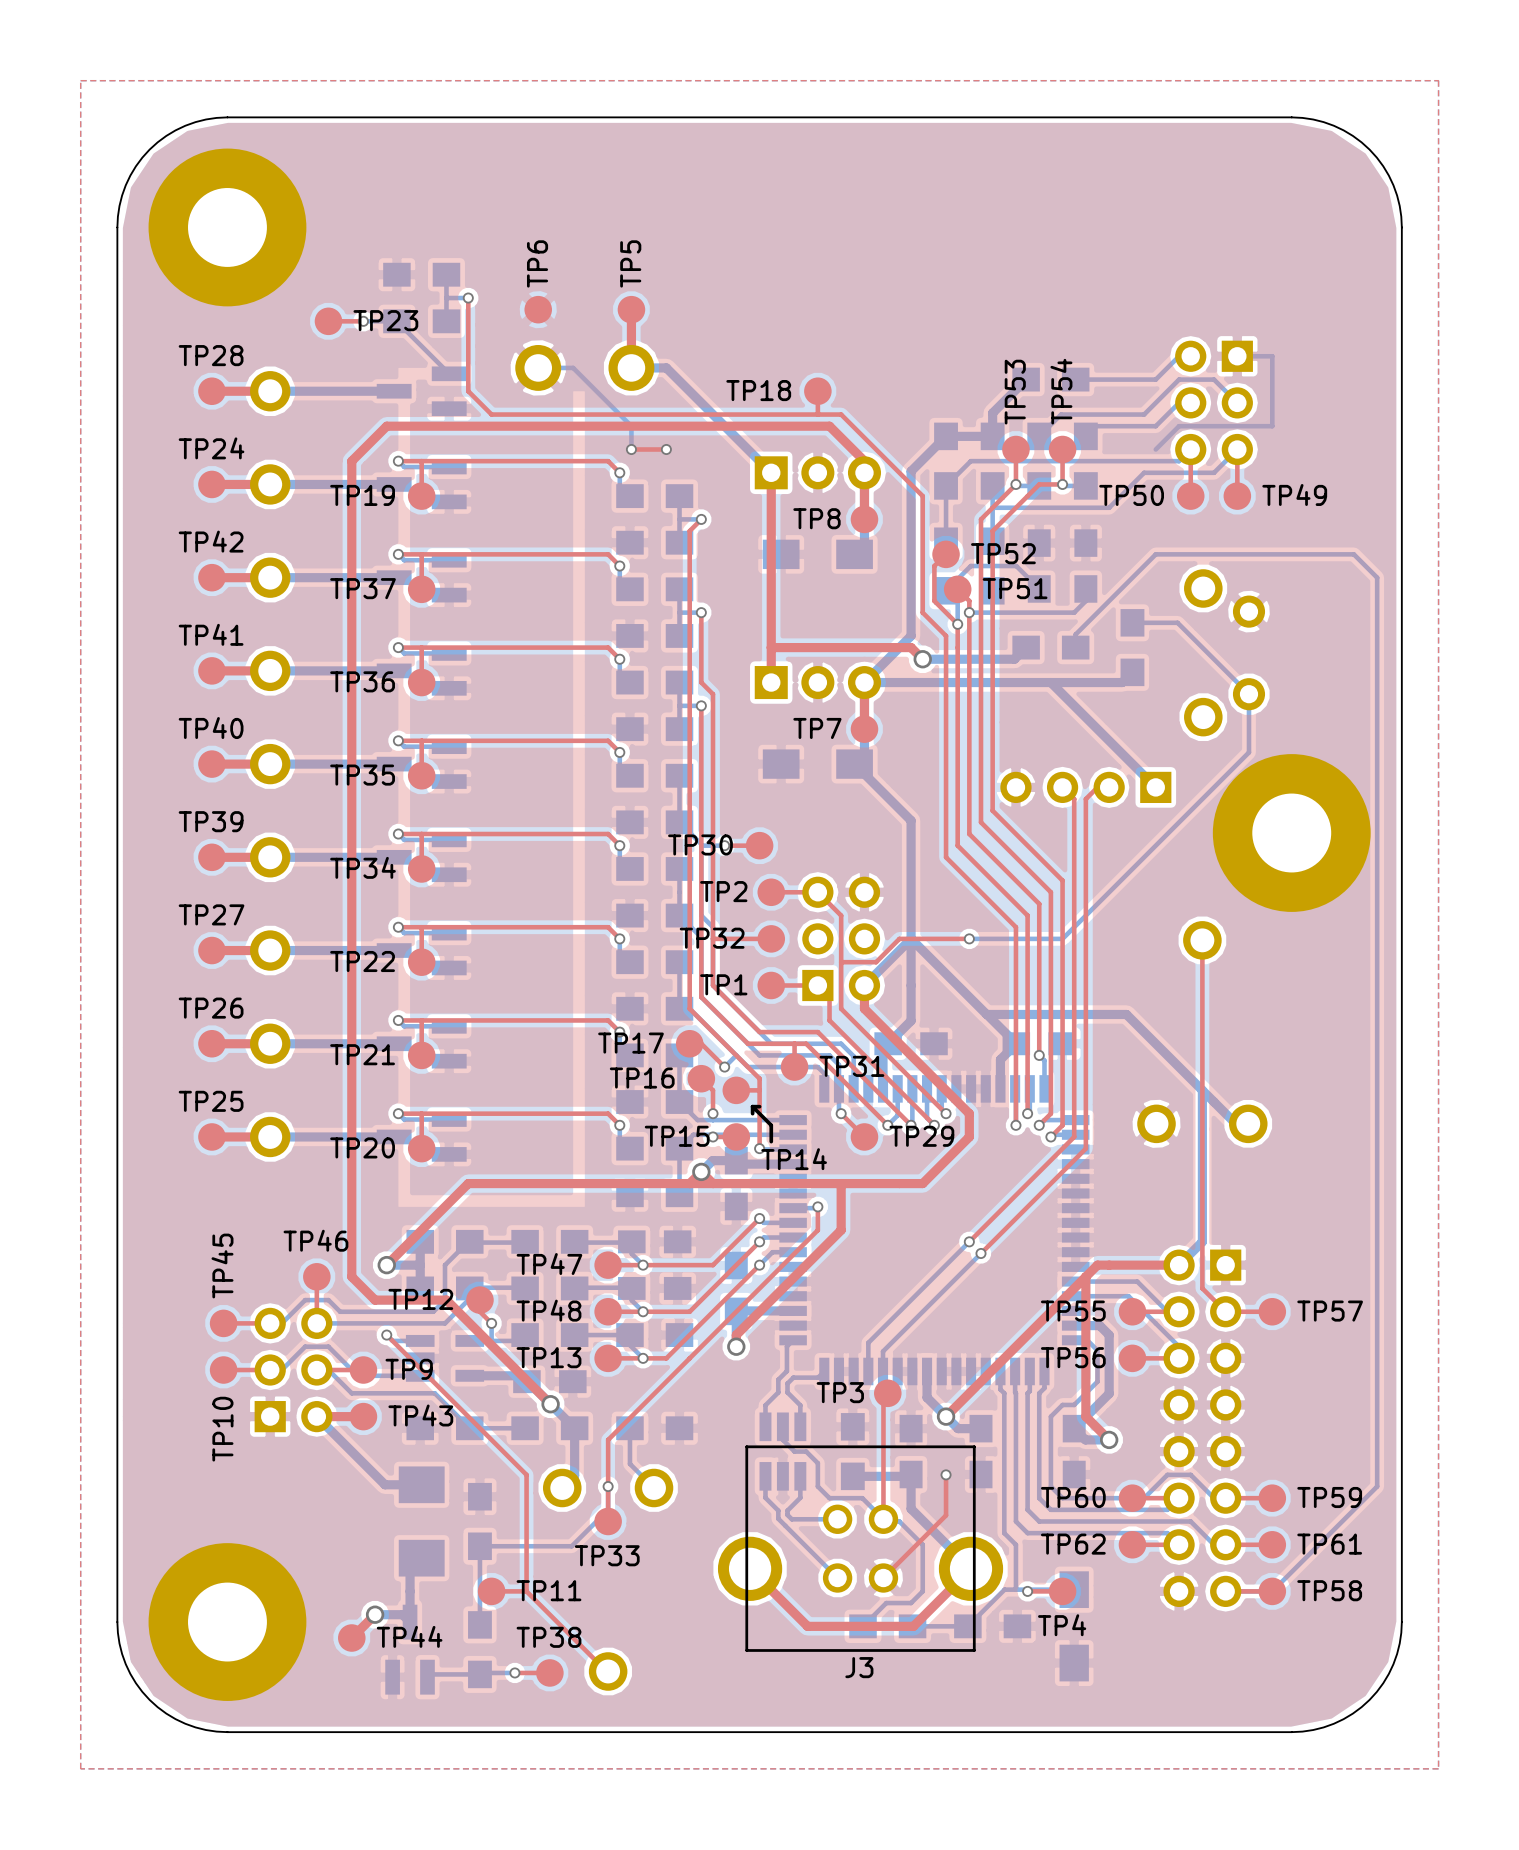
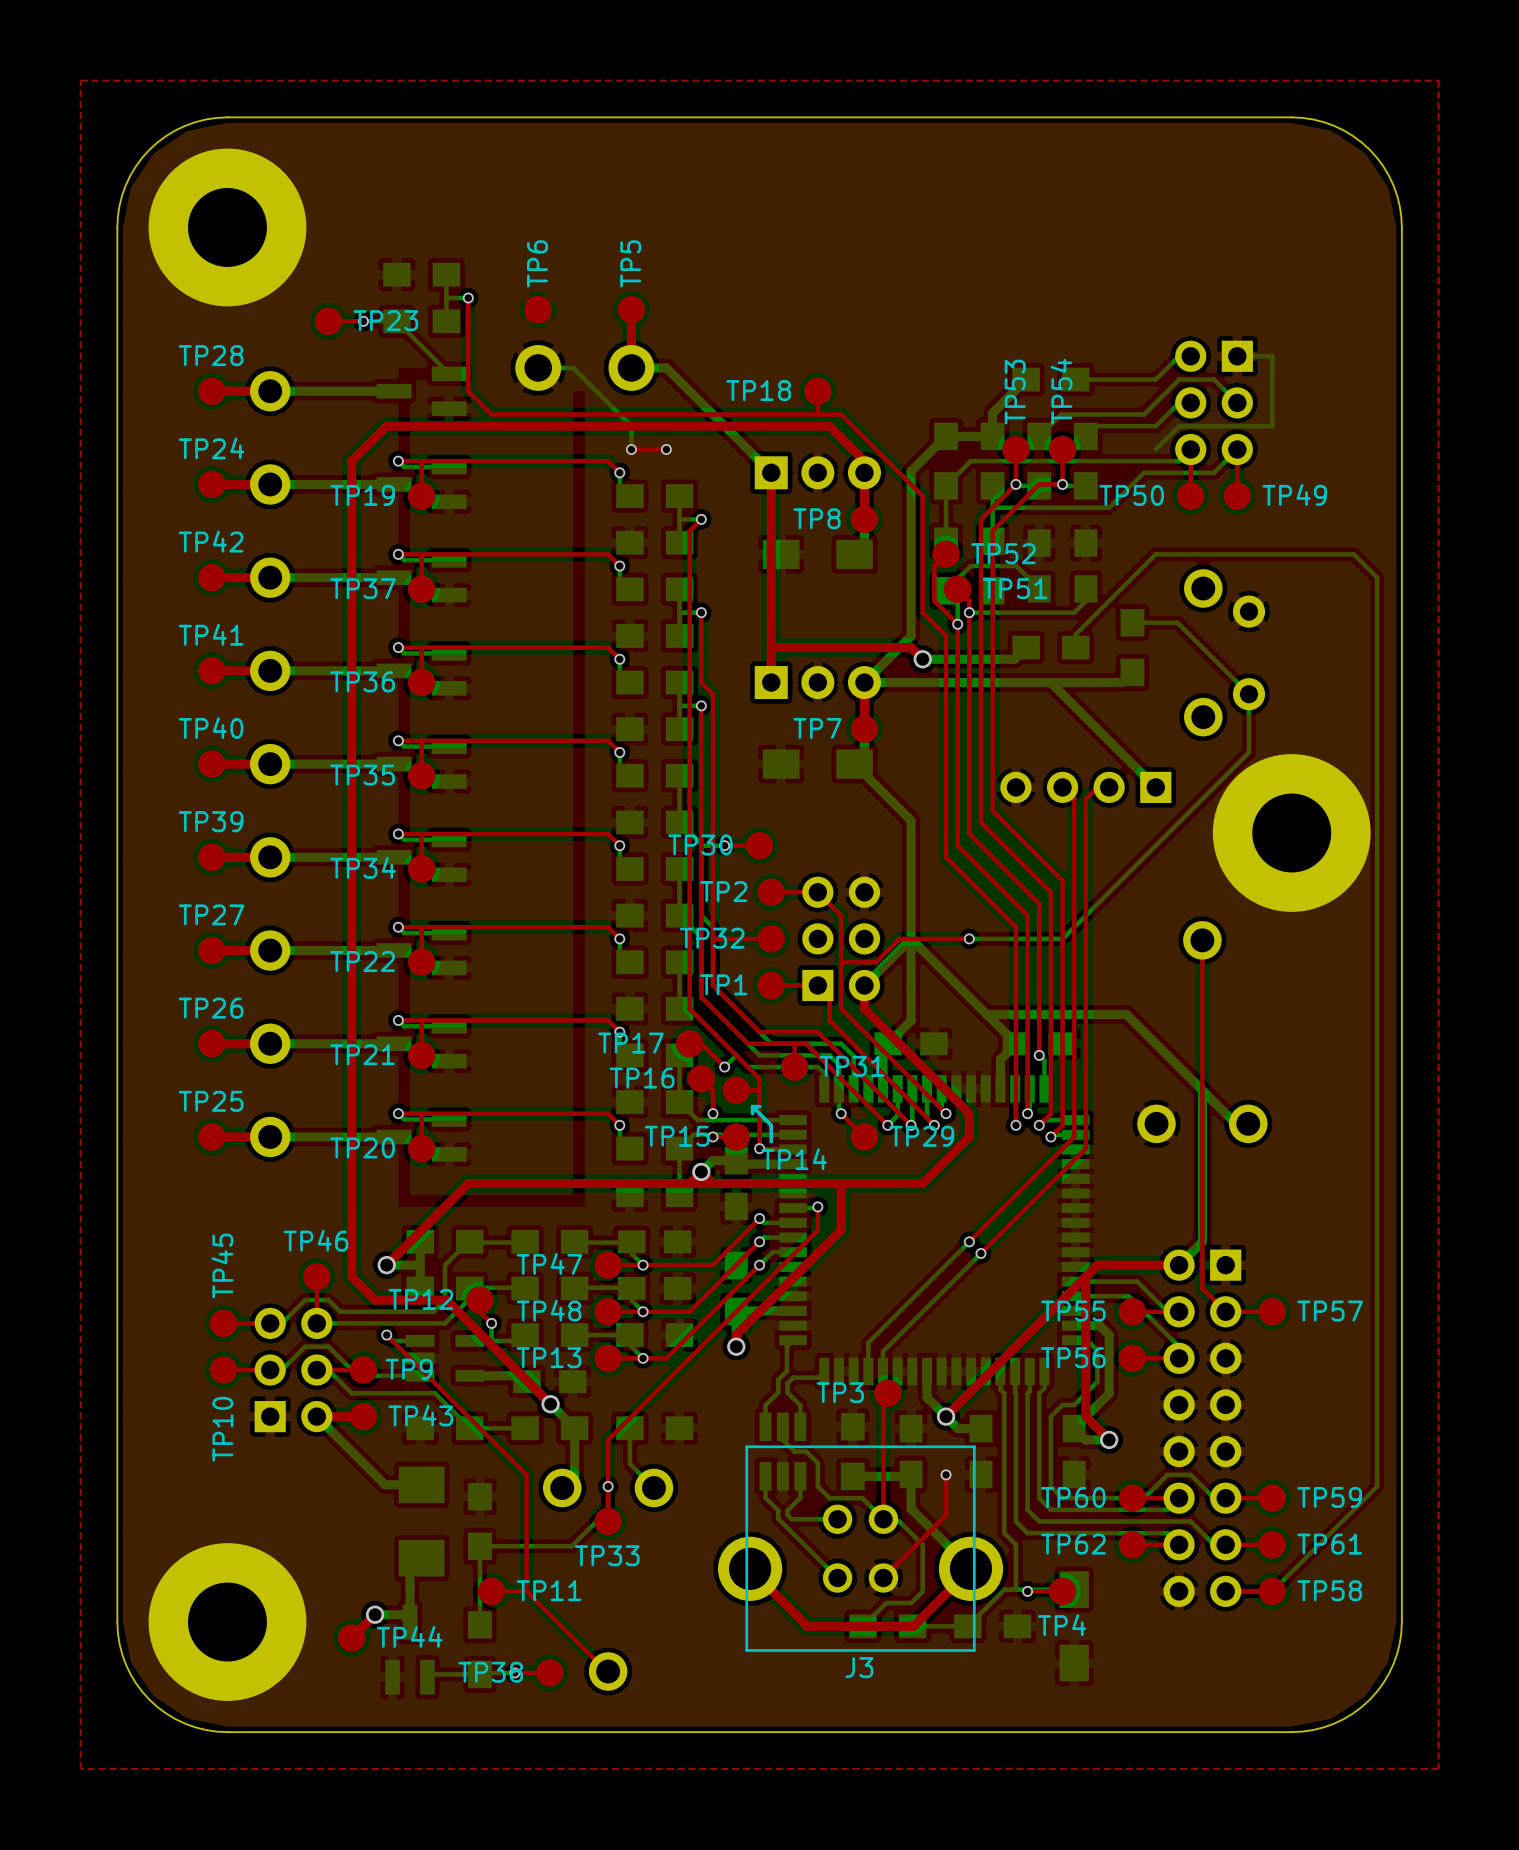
TP38 name position: TP38 (549, 1637) -> TP38 (490, 1672)

